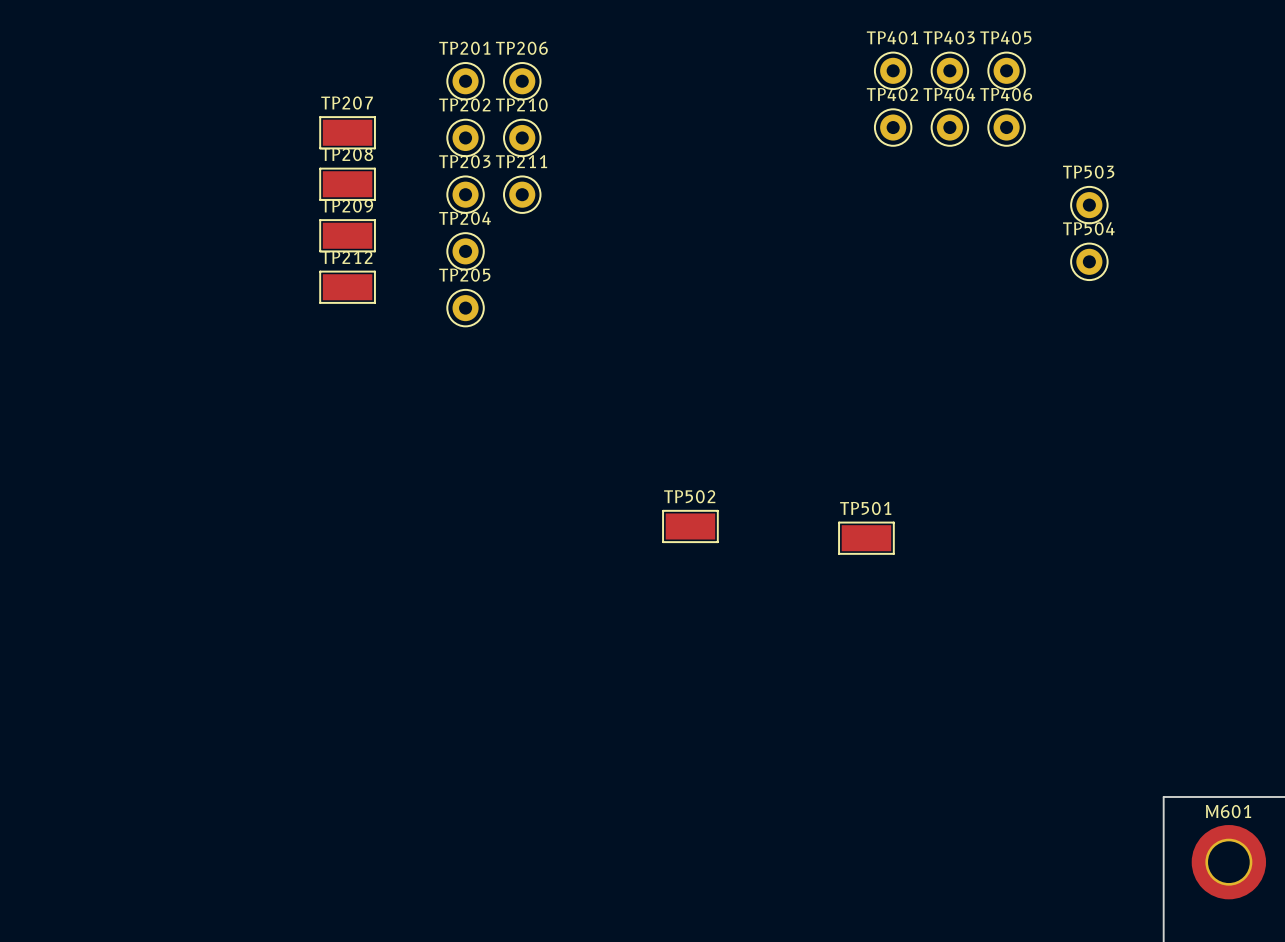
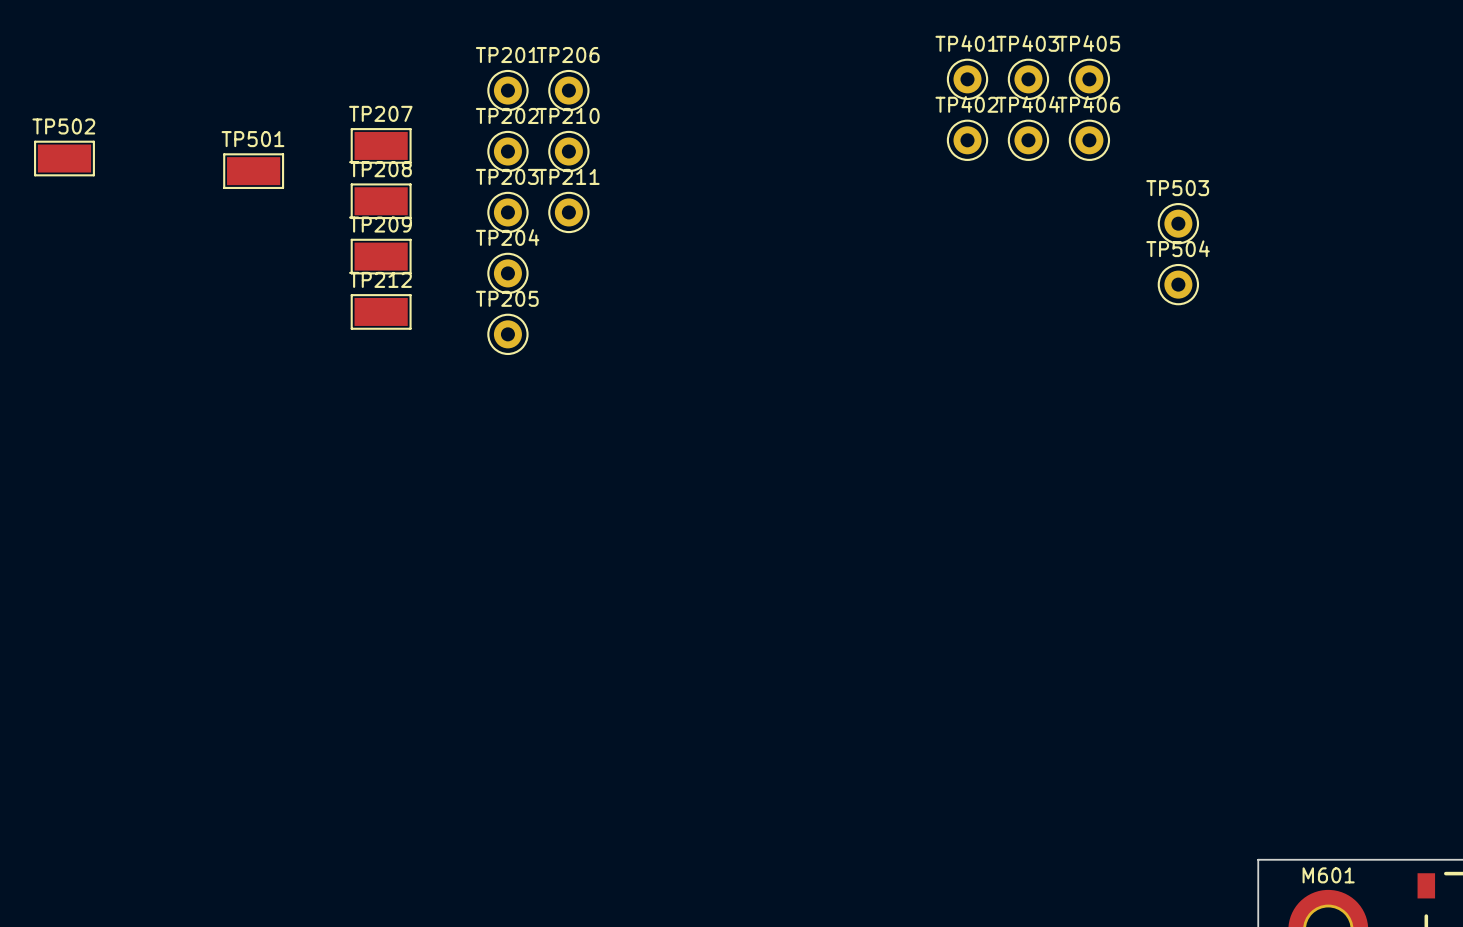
TP502 position: (690, 526) -> (64, 158)
TP501 position: (866, 538) -> (253, 171)

